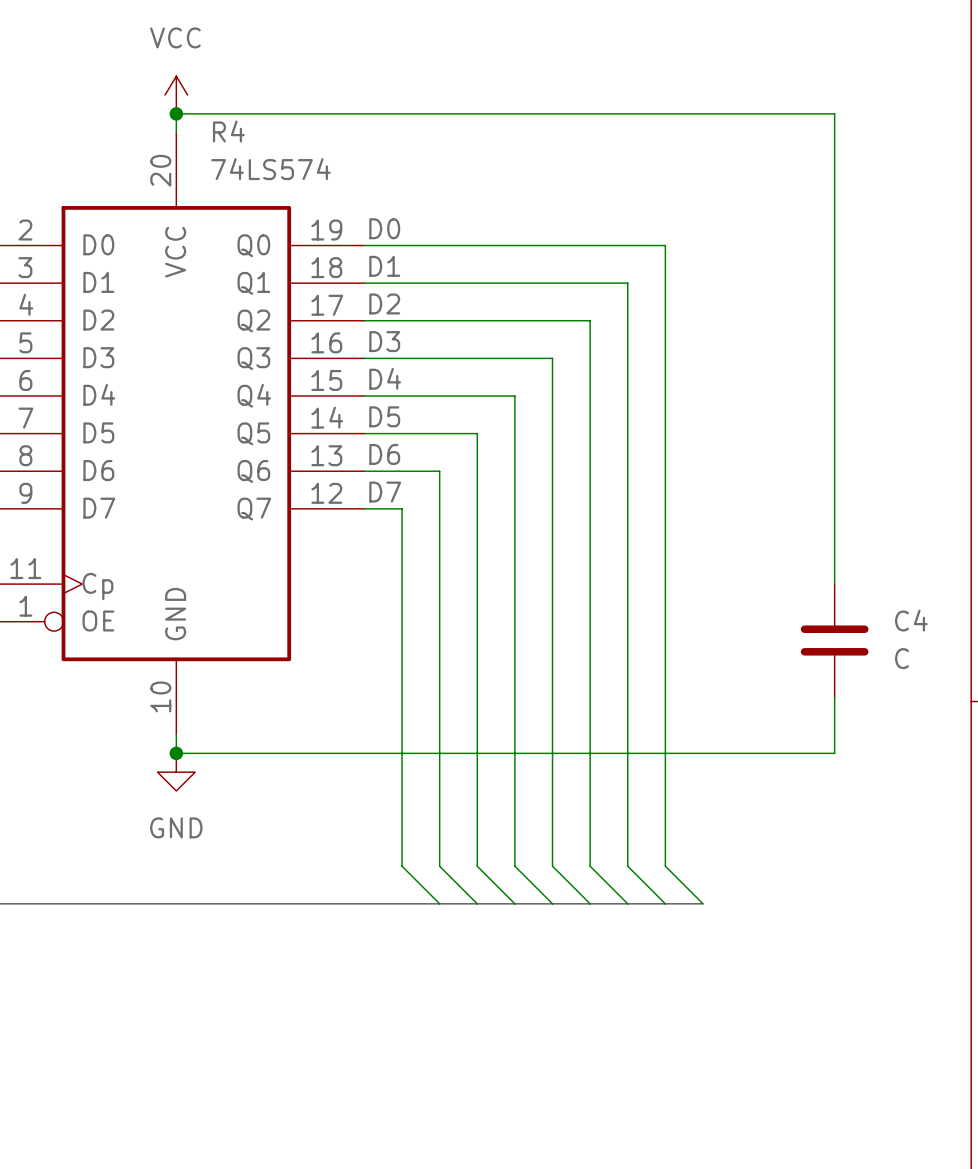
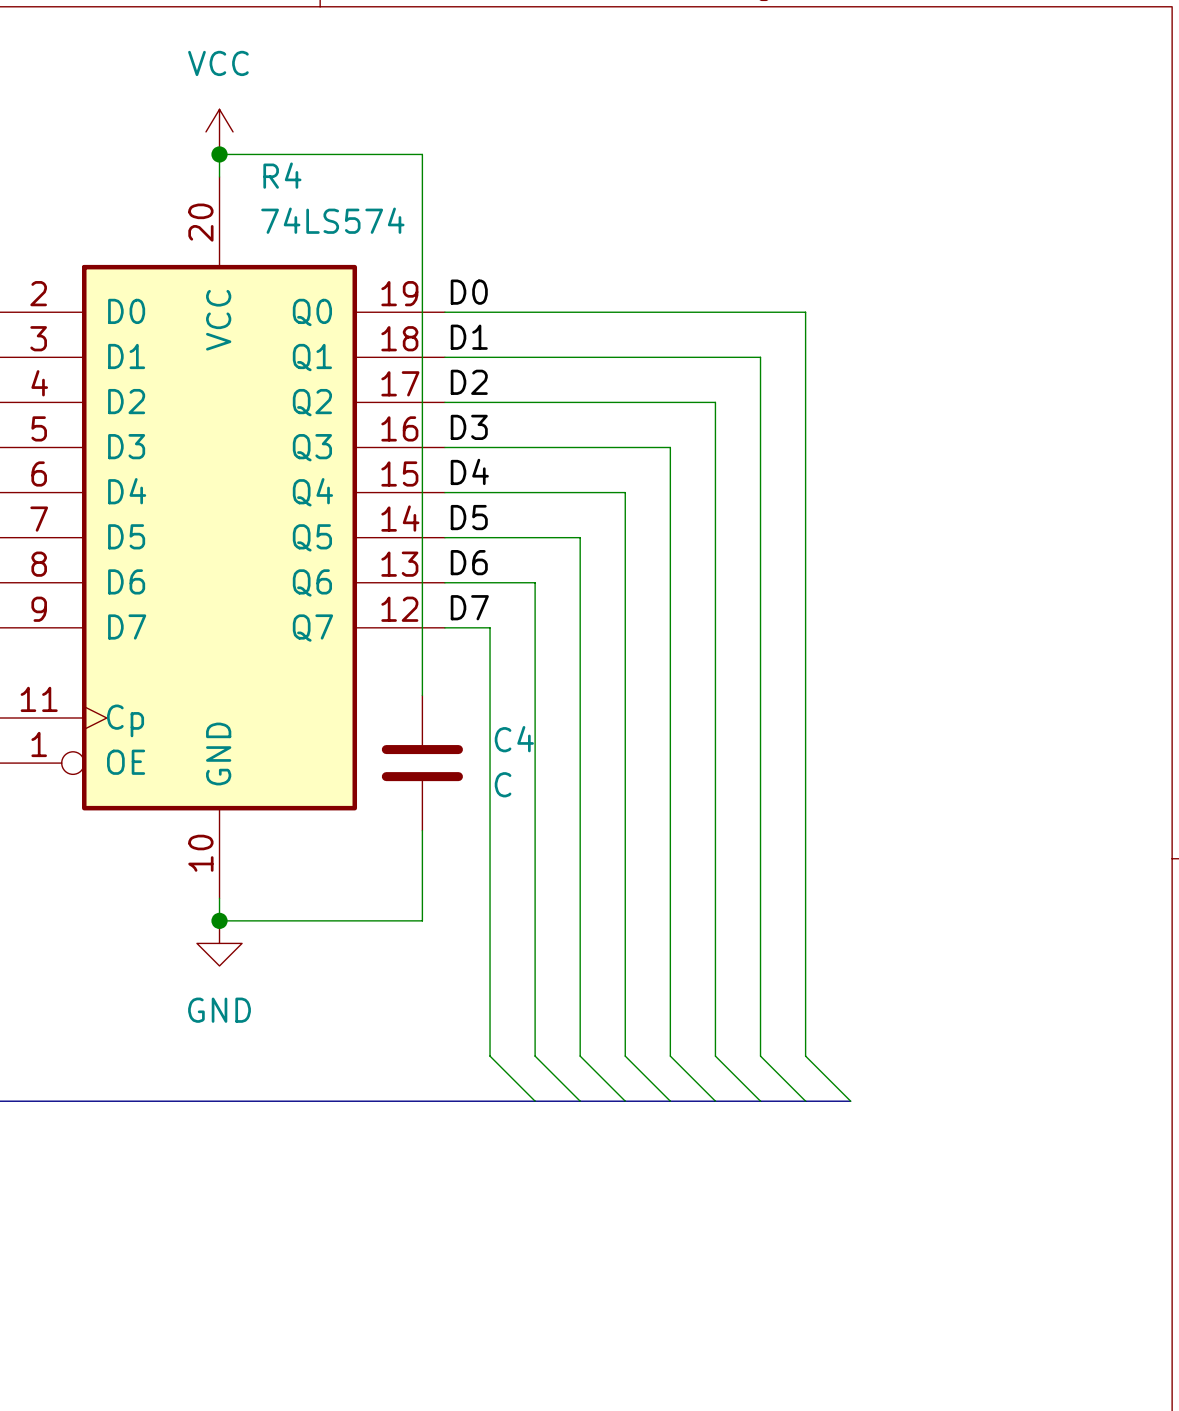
wire: (345, 113) (834, 113) (834, 584) -> (422, 154) (422, 695)
C4 position: (834, 640) -> (422, 763)
wire: (834, 696) (834, 753) (345, 753) -> (422, 830) (422, 920)

